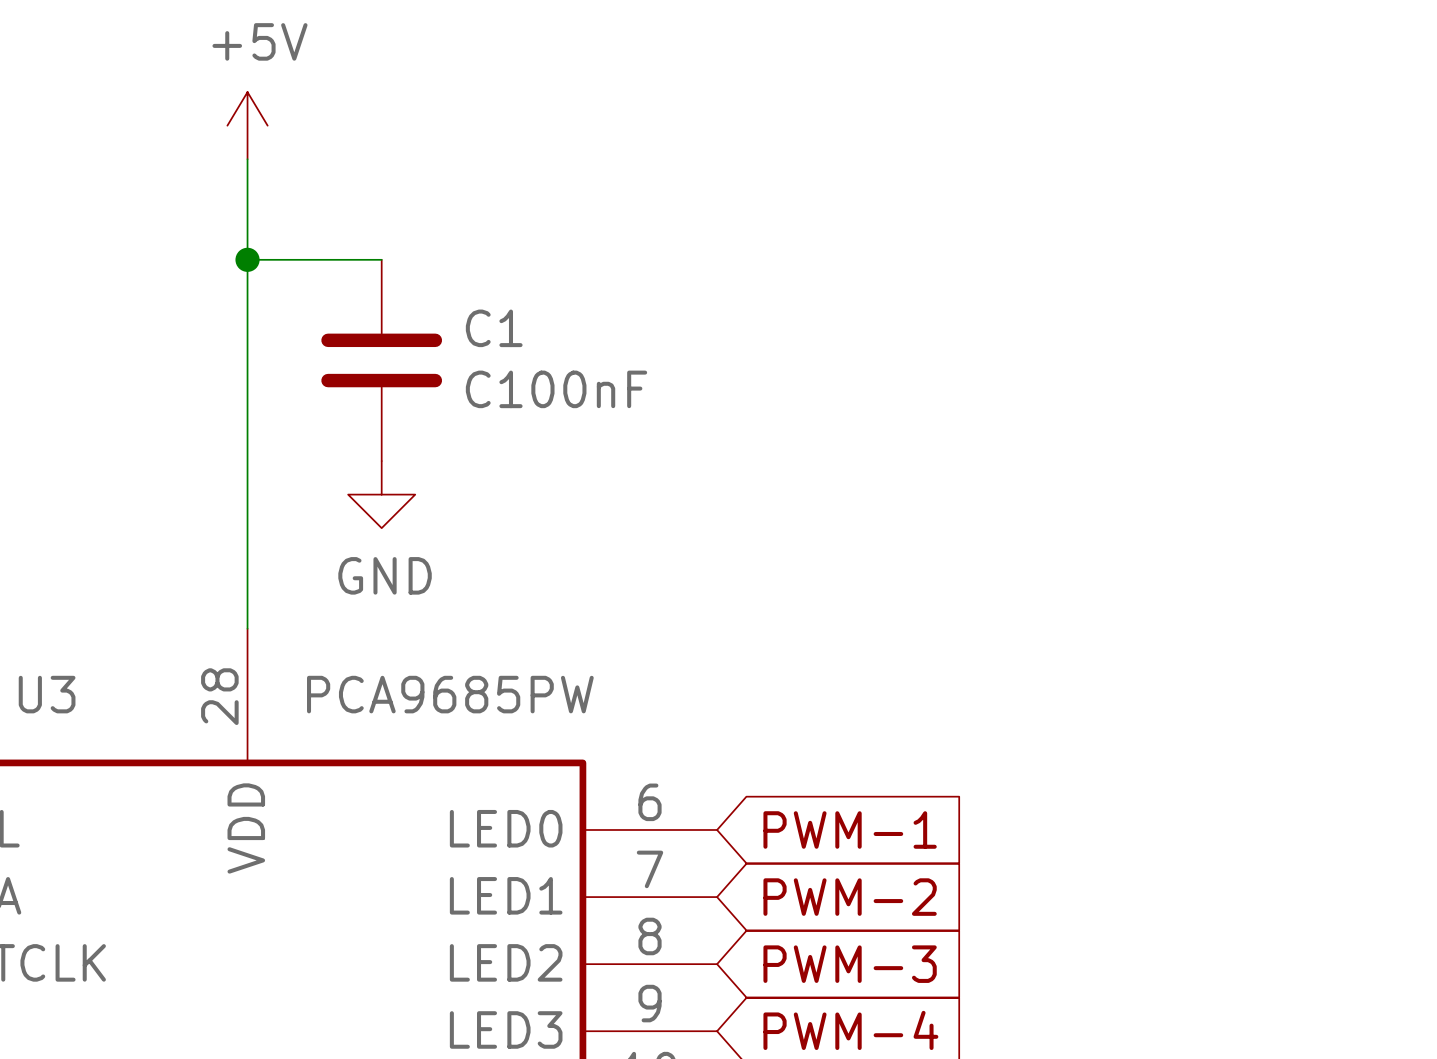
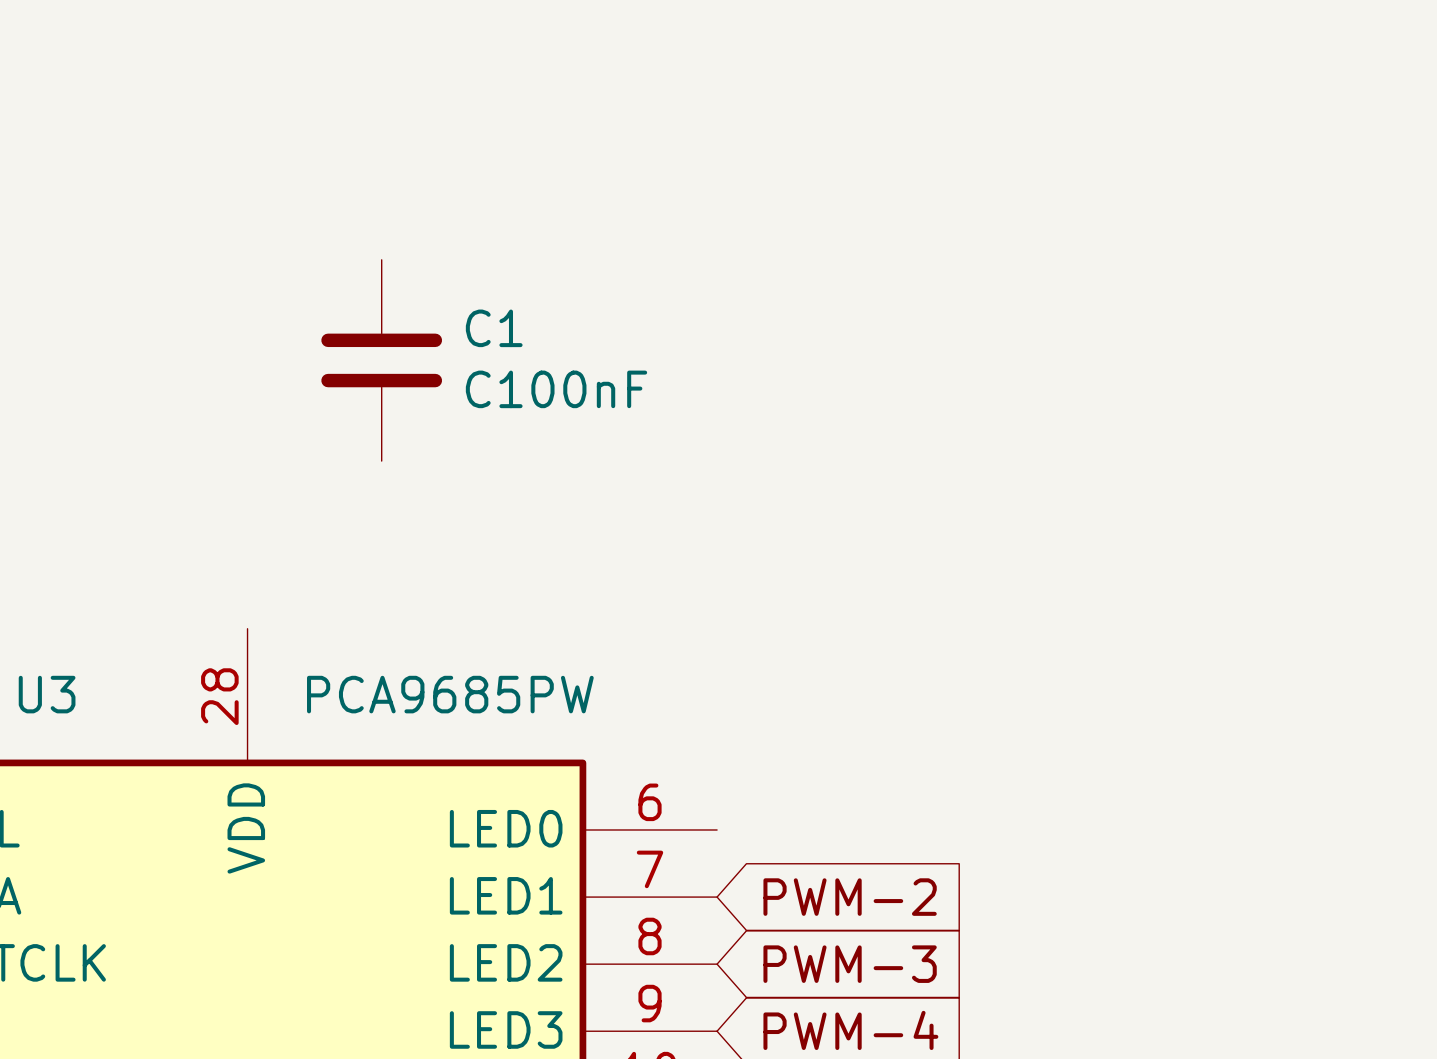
power symbol: +5V (247, 125) -> none
wire: (247, 159) (247, 628) -> none
wire: (247, 259) (381, 259) -> none
junction: (247, 259) -> none
power symbol: GND (381, 494) -> none
global label: PWM-1 (850, 829) -> none

